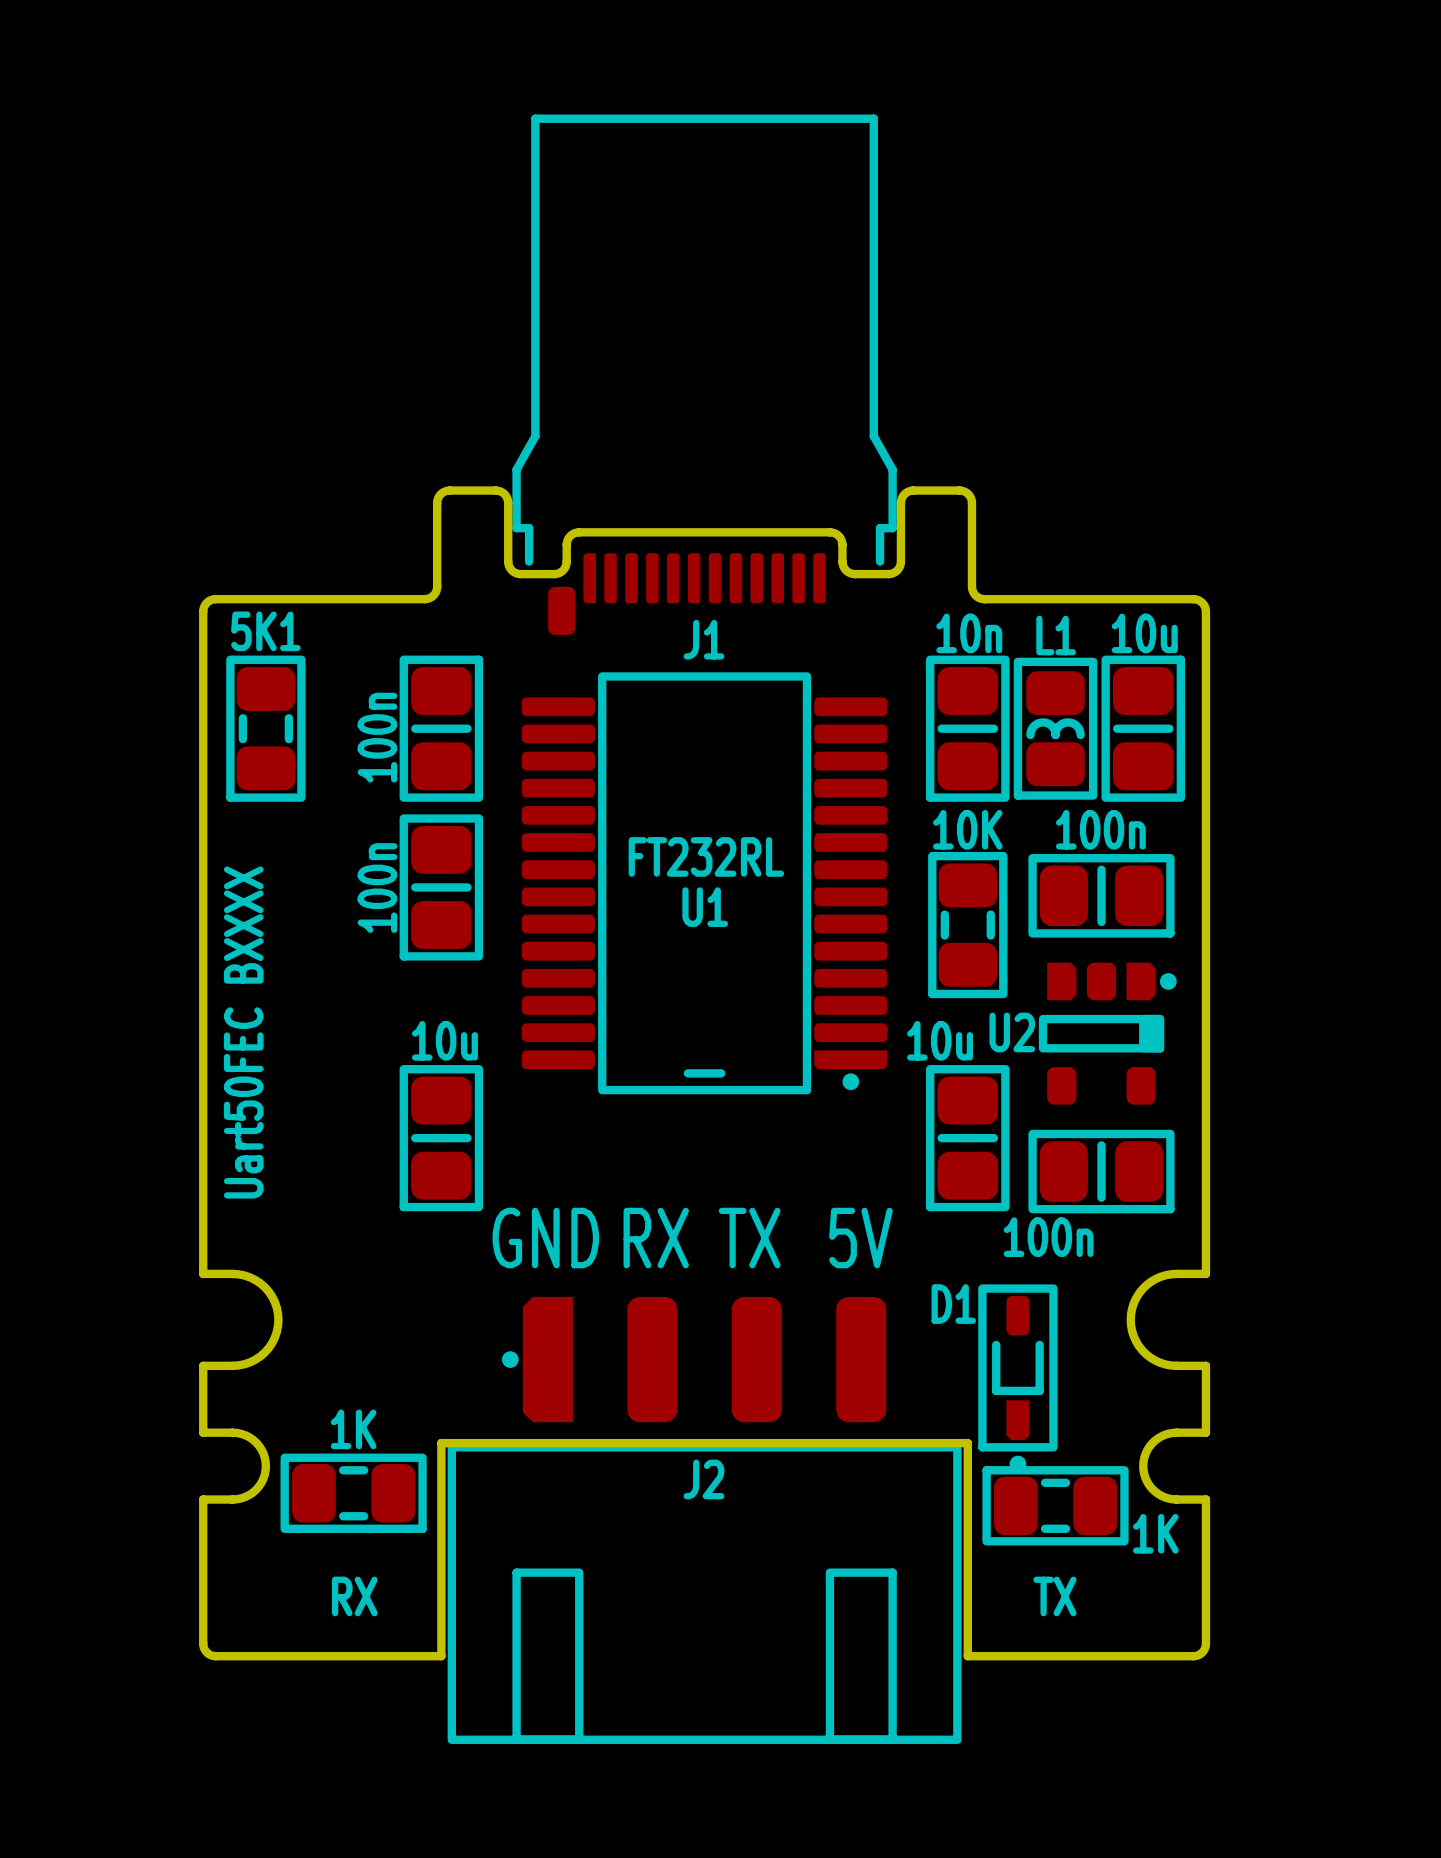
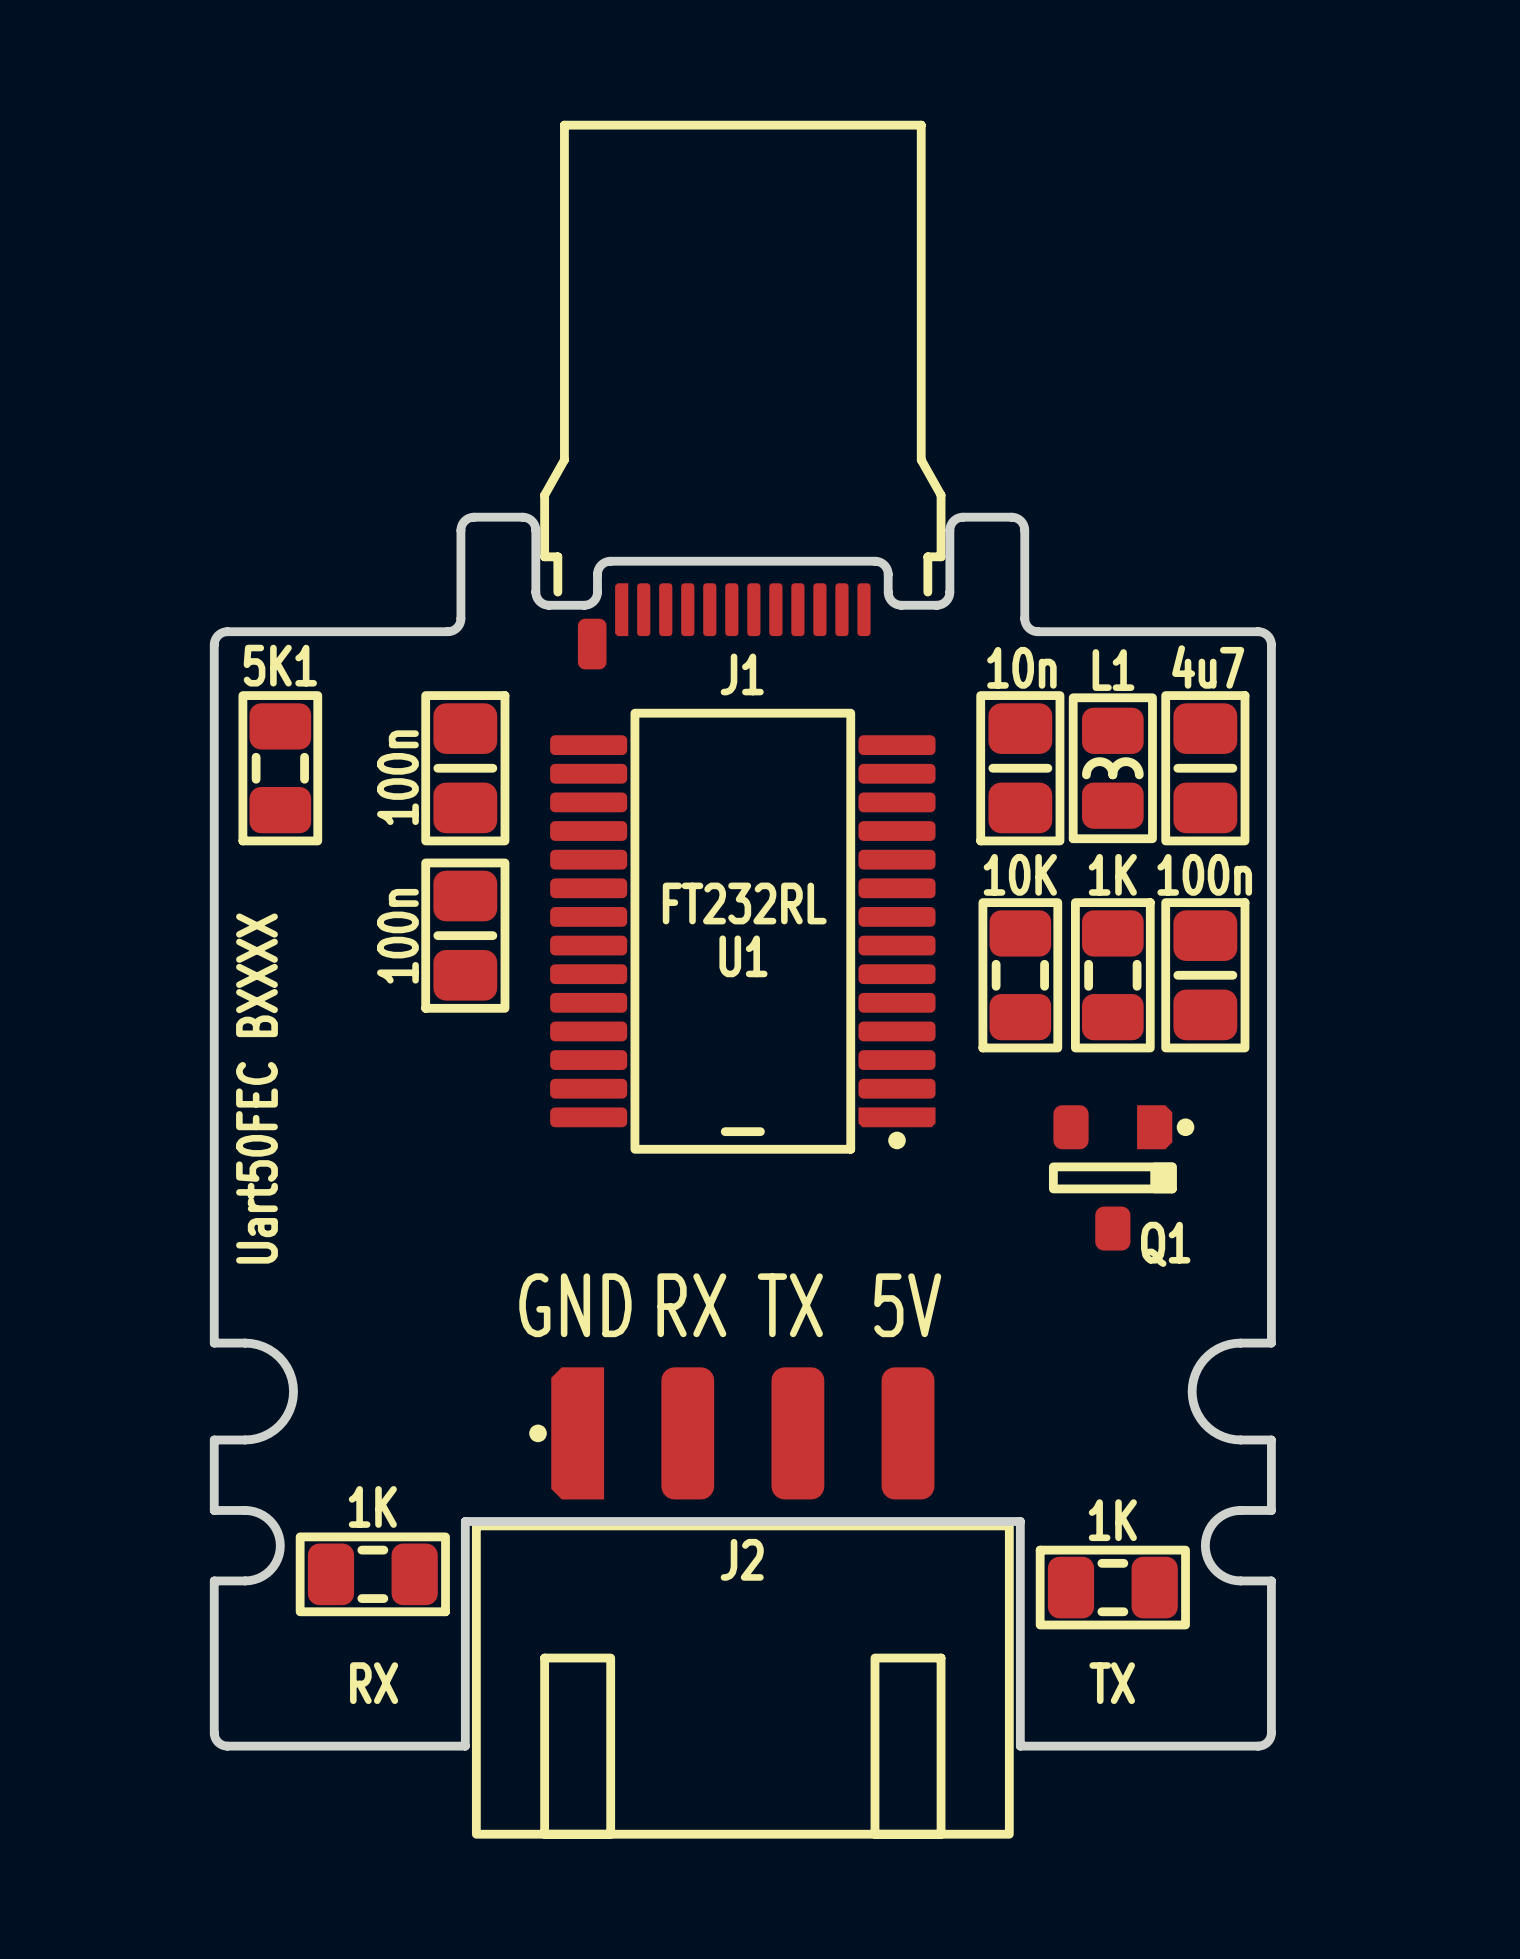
part value: 10u (1144, 633) -> 4u7 (1208, 666)
part rotation: 0° (1101, 895) -> 90° clockwise (1205, 975)
part: none -> 1K (1112, 975)
U2: (1107, 1033) -> none
Q1: none -> (1121, 1177)
part: 10u (441, 1138) -> none
part: 10u (967, 1138) -> none
part: 100n (1101, 1171) -> none
D1: (1017, 1378) -> none
part value position: 1K (1155, 1533) -> 1K (1112, 1520)

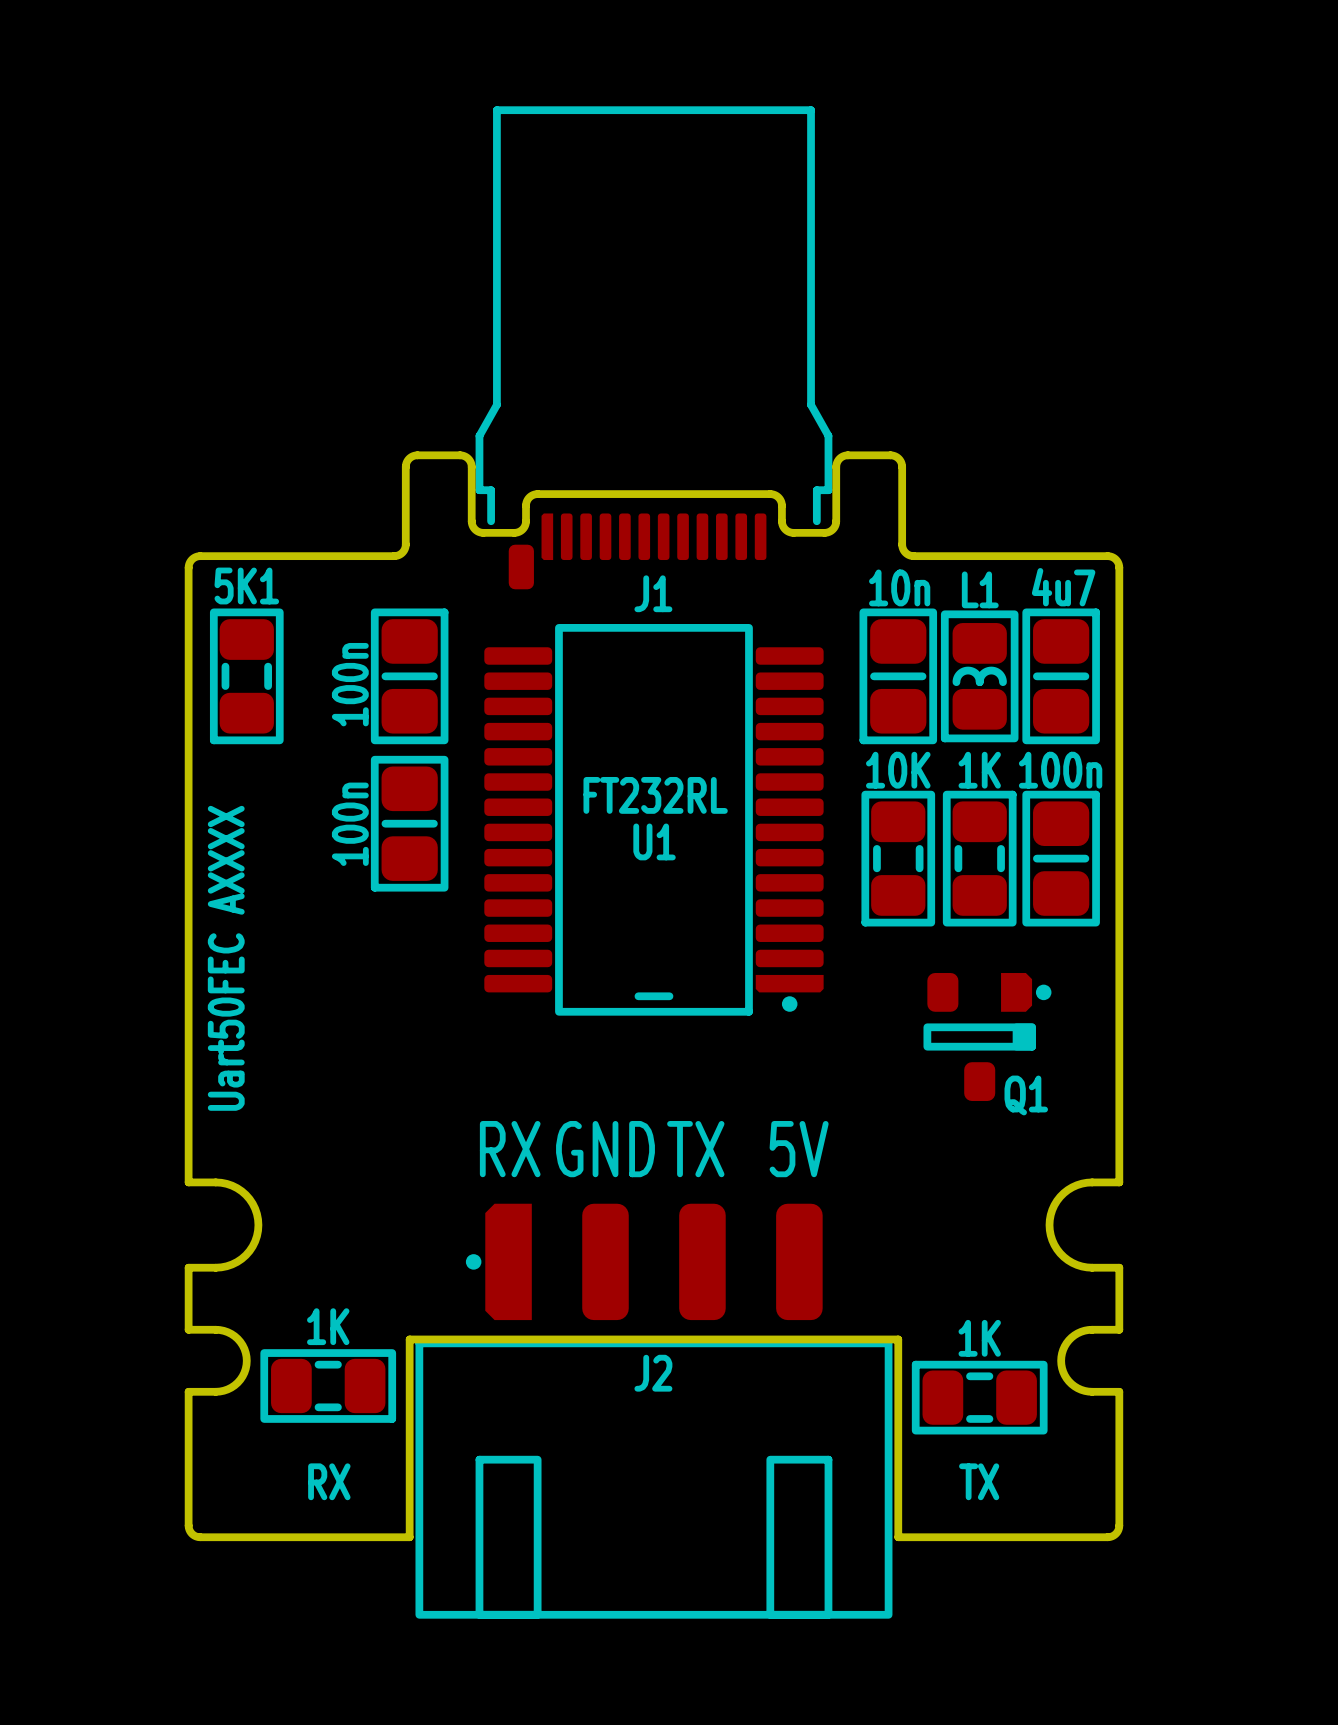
text: Uart50FEC BXXXX (256, 1088) -> Uart50FEC AXXXX (226, 958)
text: GND (575, 1305) -> RX (510, 1149)
text: RX (691, 1305) -> GND (605, 1149)

